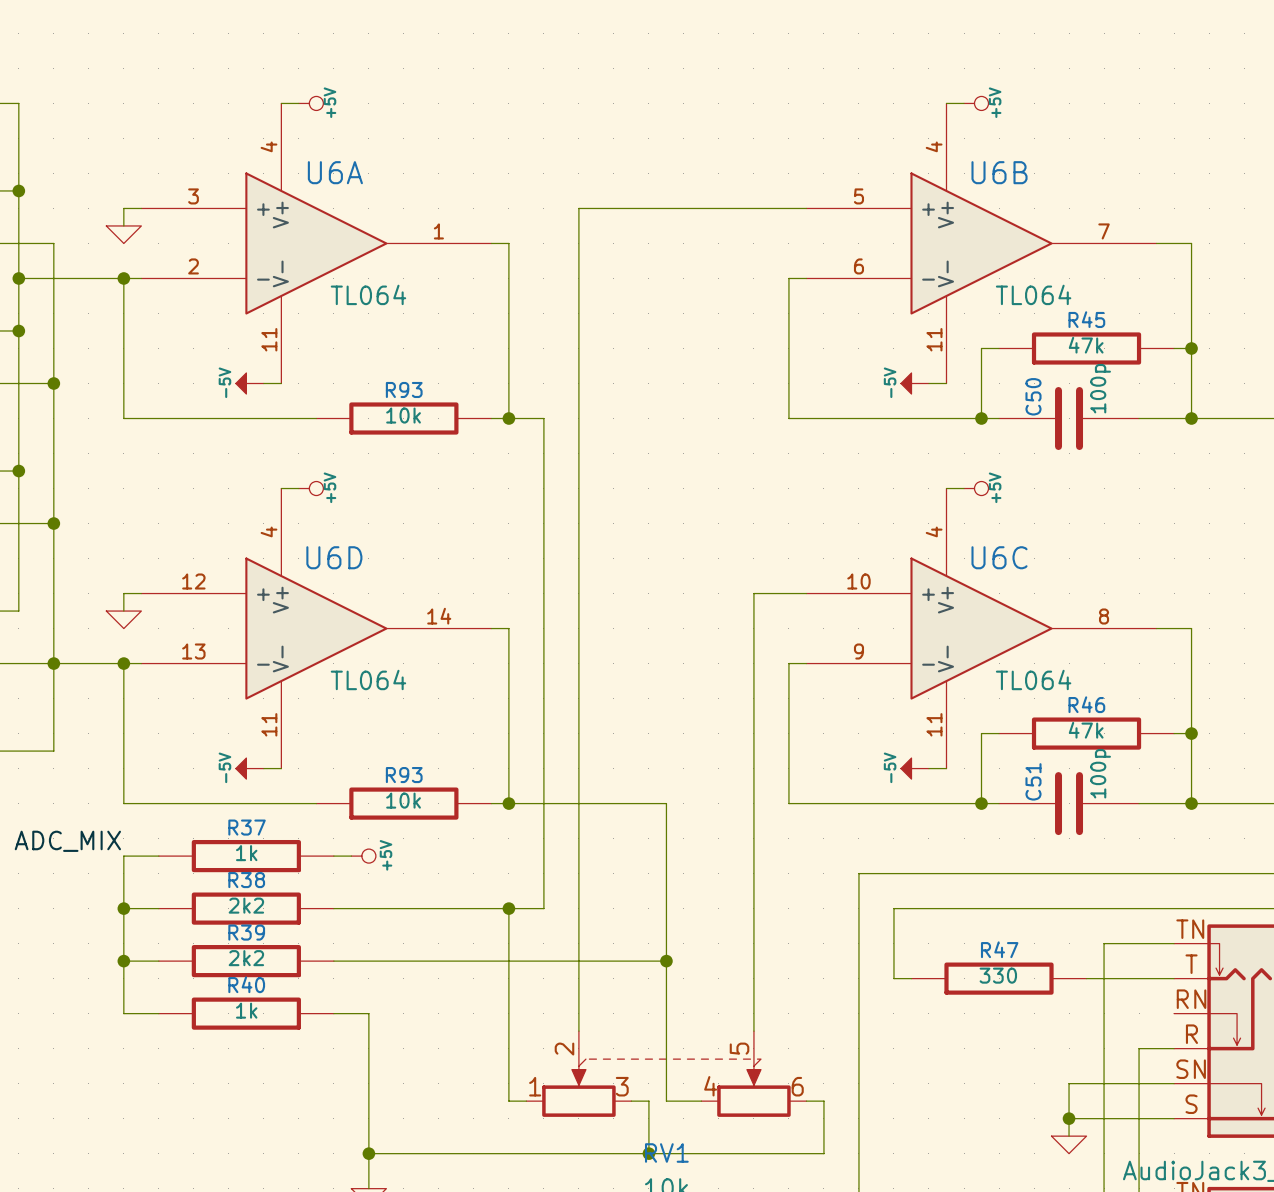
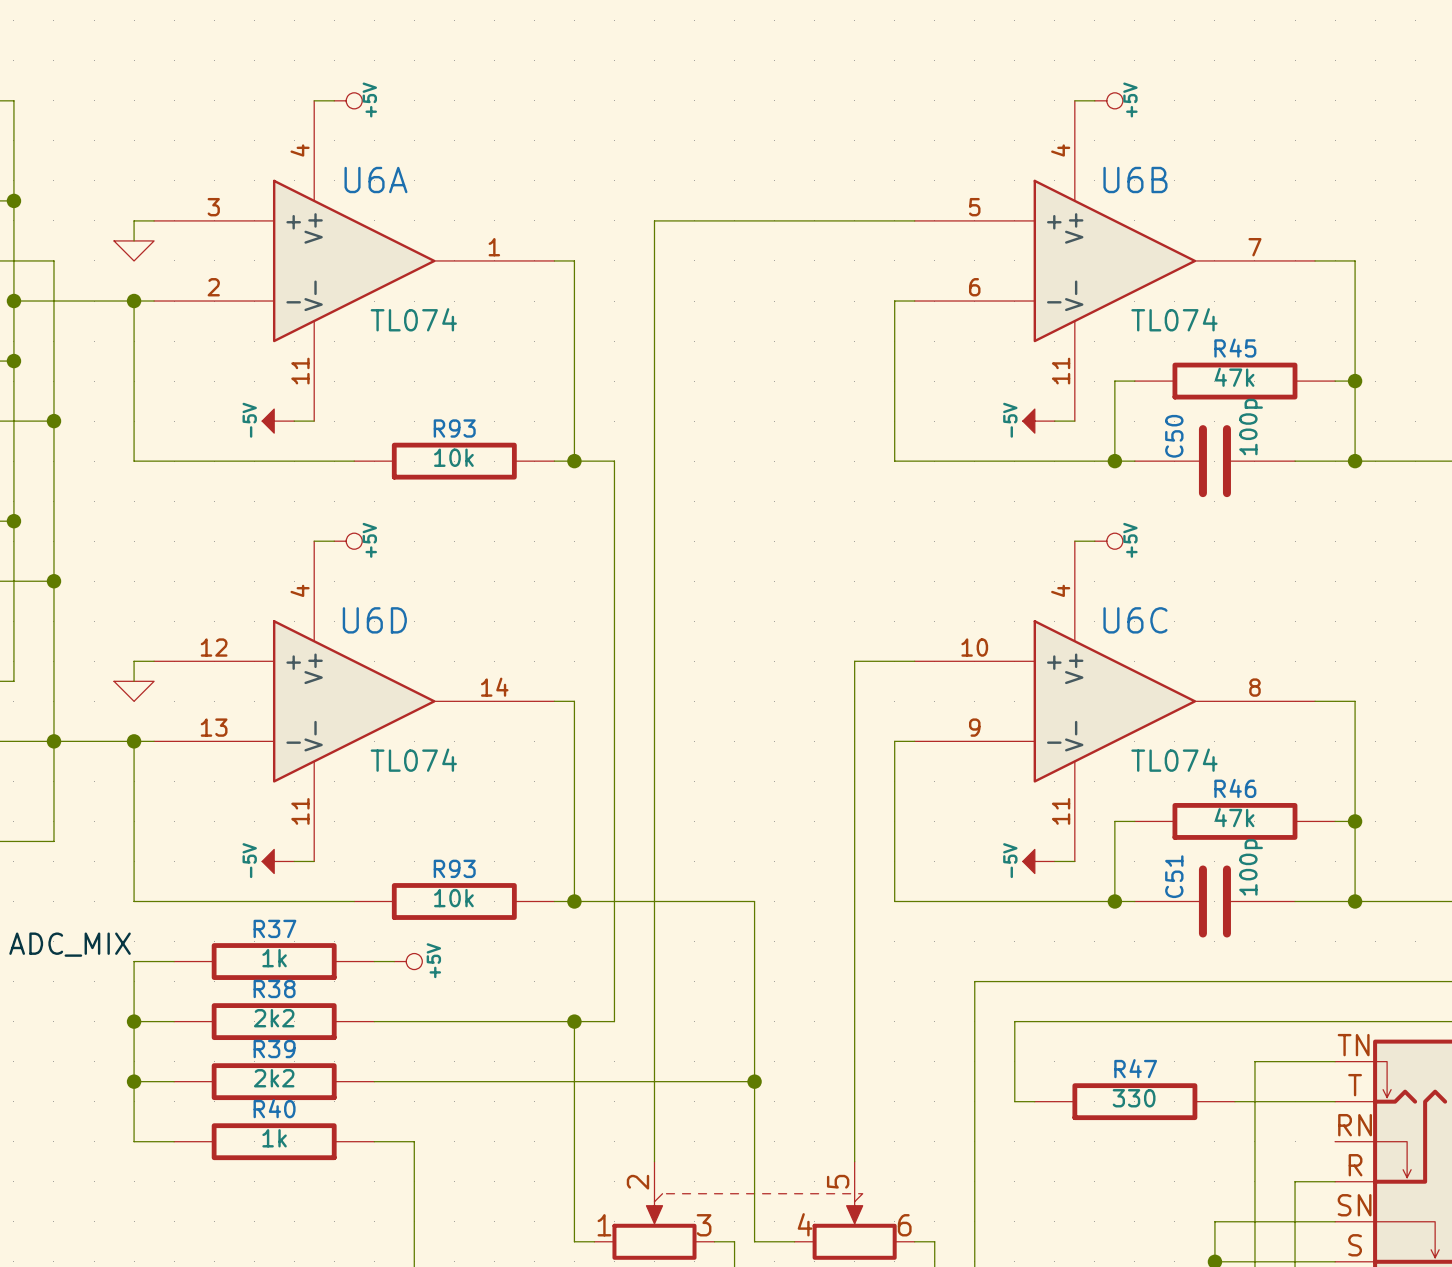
U6A value: TL064 (368, 294) -> TL074 (413, 319)
U6B value: TL064 (1033, 294) -> TL074 (1174, 319)
U6D value: TL064 (368, 679) -> TL074 (413, 760)
U6C value: TL064 (1033, 679) -> TL074 (1174, 760)

